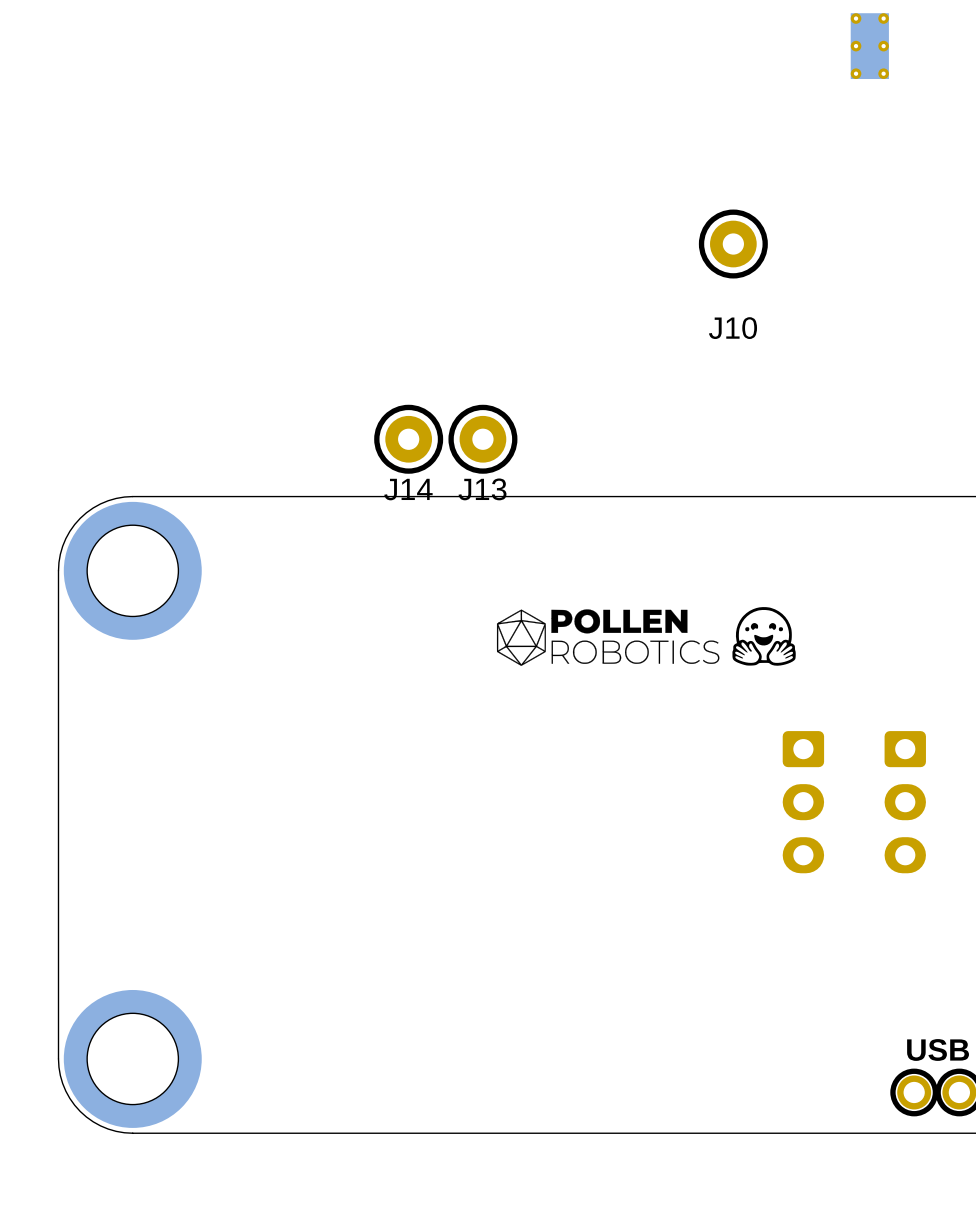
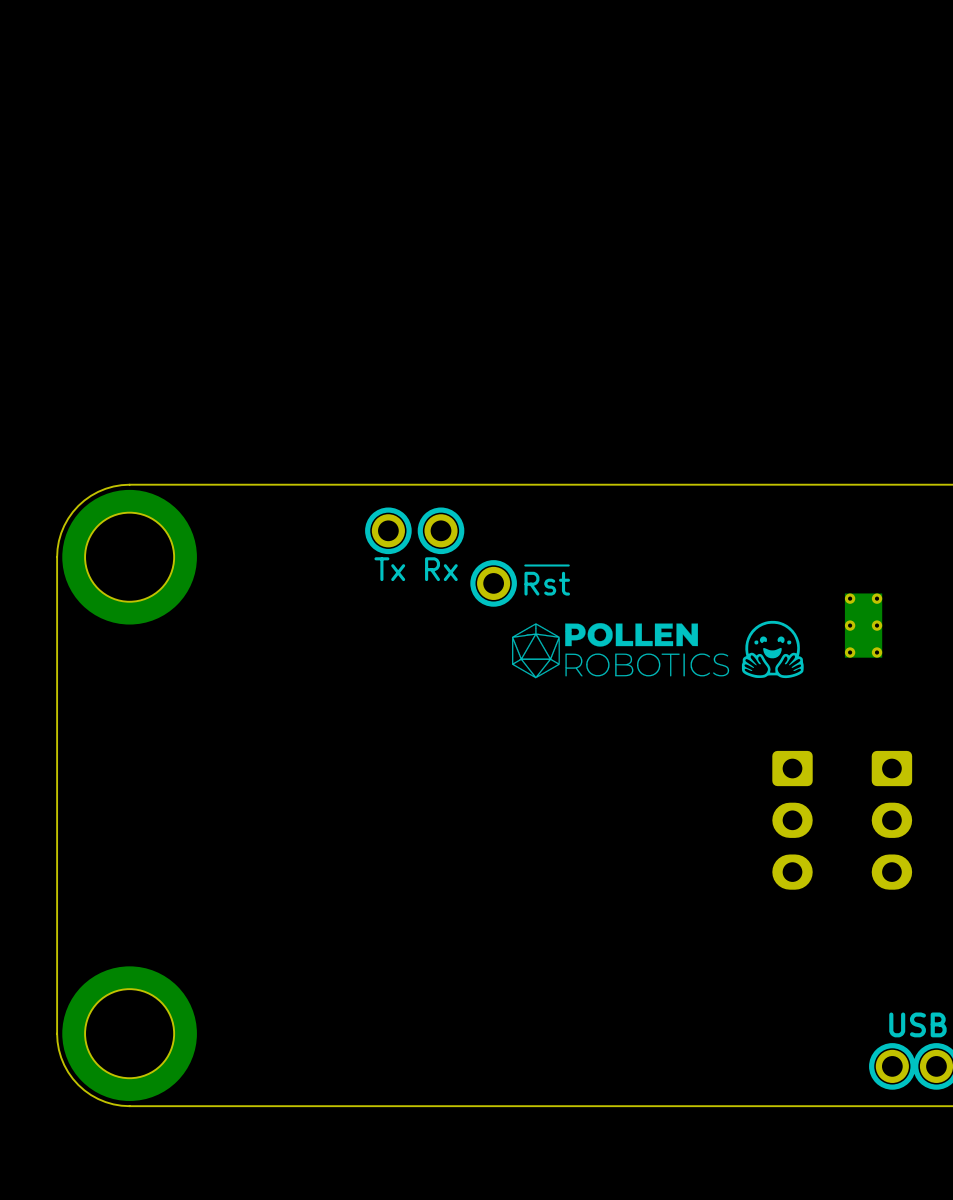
part: (869, 46) -> none
J10: (733, 244) -> none
J14: (408, 439) -> none
J13: (482, 439) -> none
part: none -> (388, 530)
part: none -> (441, 530)
line: none -> (568, 565) (525, 565)
text: none -> Tx (389, 569)
text: none -> Rx (441, 569)
part: none -> (493, 583)
text: none -> Rst (547, 583)
drawing position: (764, 636) -> (772, 649)
drawing position: (608, 637) -> (620, 650)
part: none -> (863, 625)
part position: (803, 802) -> (792, 820)
part position: (905, 802) -> (891, 820)

